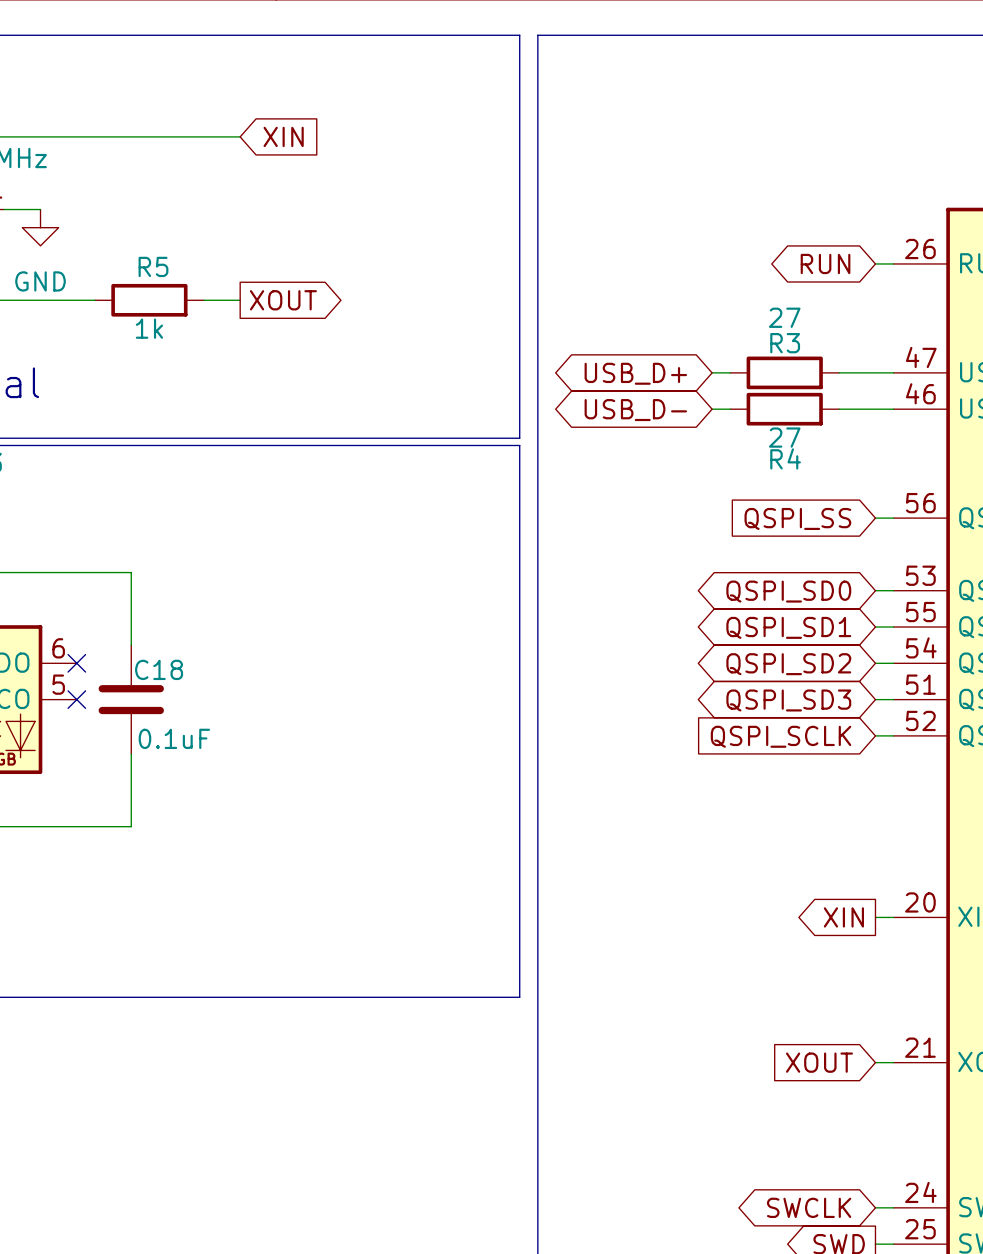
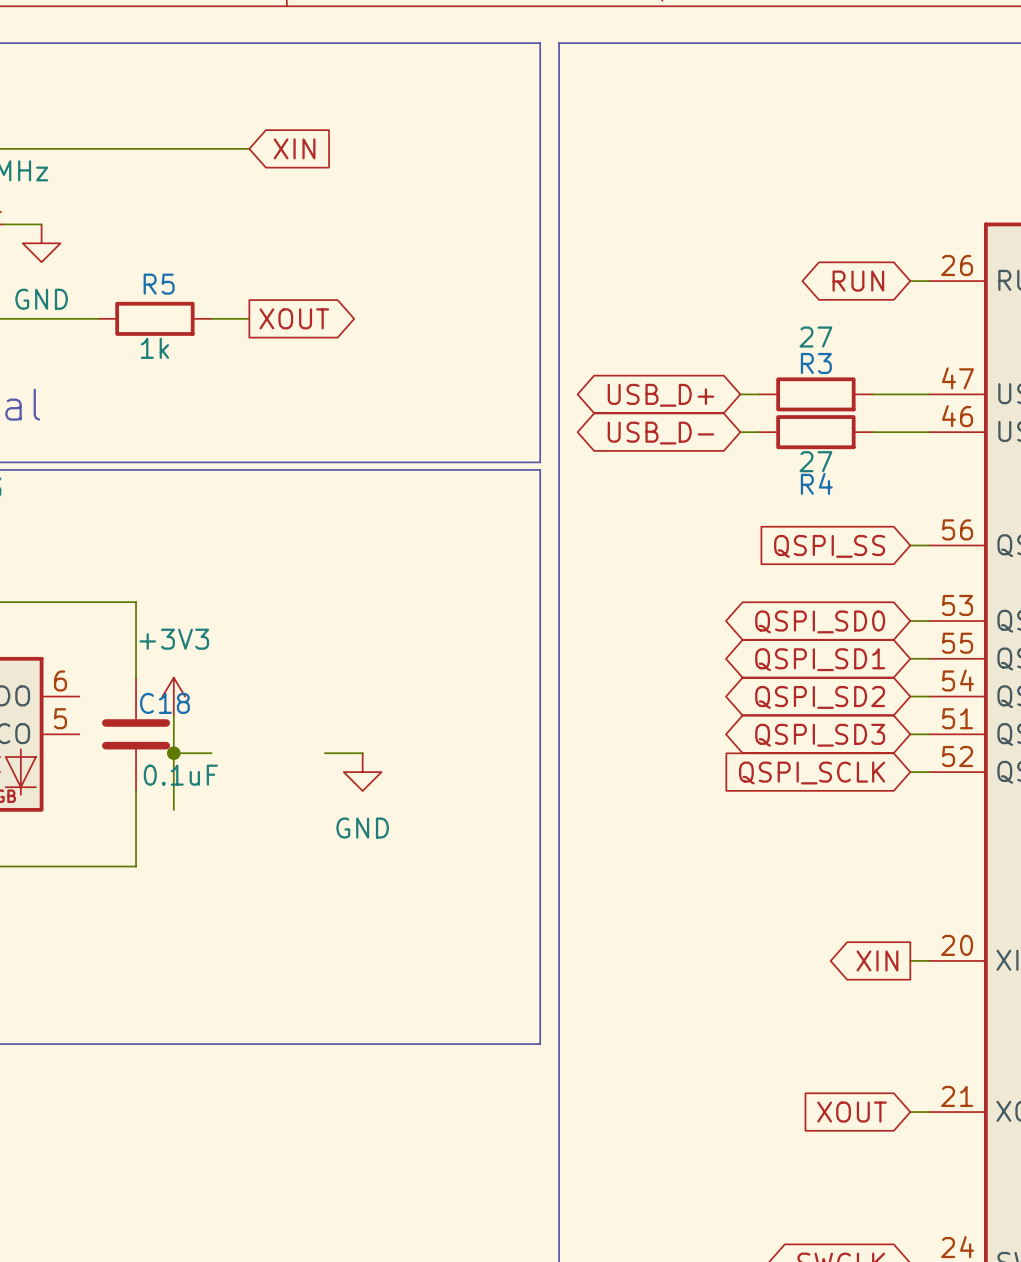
no-connect mark: (76, 663) -> none
power symbol: none -> +3V3 (173, 696)
wire: none -> (173, 715) (173, 809)
no-connect mark: (76, 699) -> none
wire: none -> (173, 753) (211, 753)
junction: none -> (173, 753)
wire: none -> (324, 753) (362, 753)
power symbol: none -> GND (362, 772)

